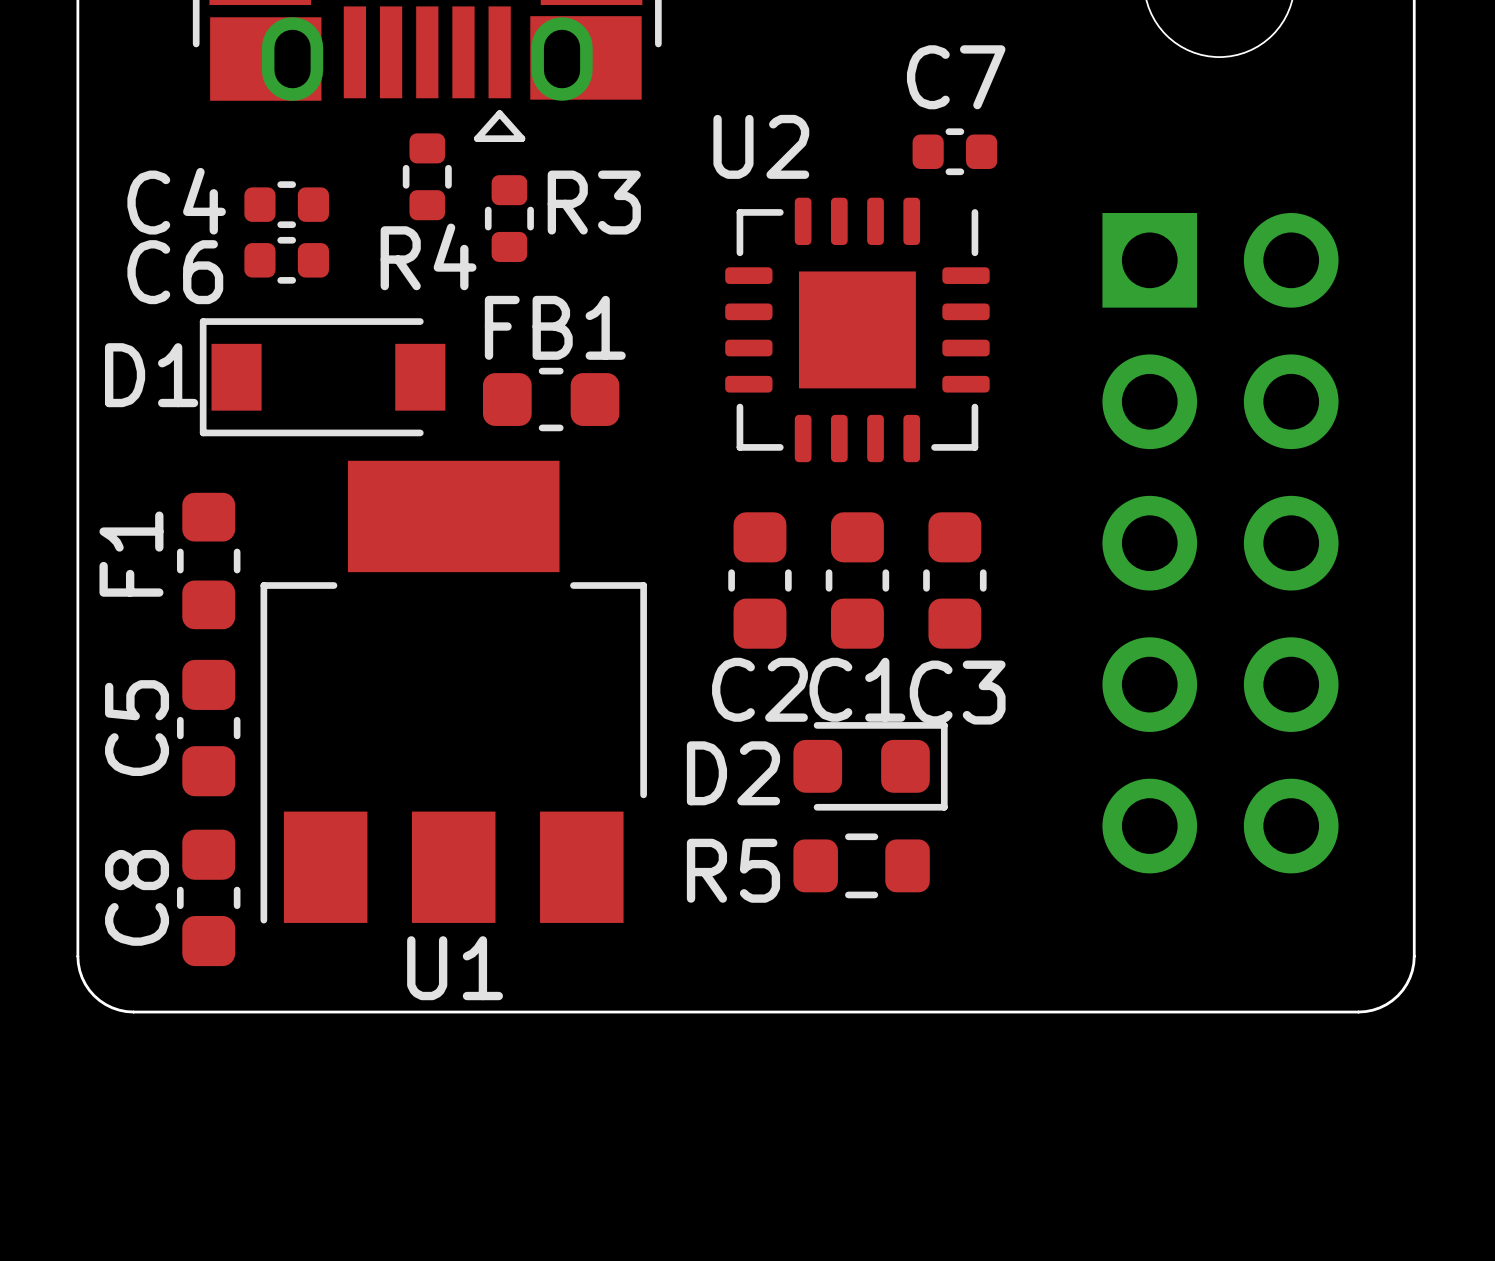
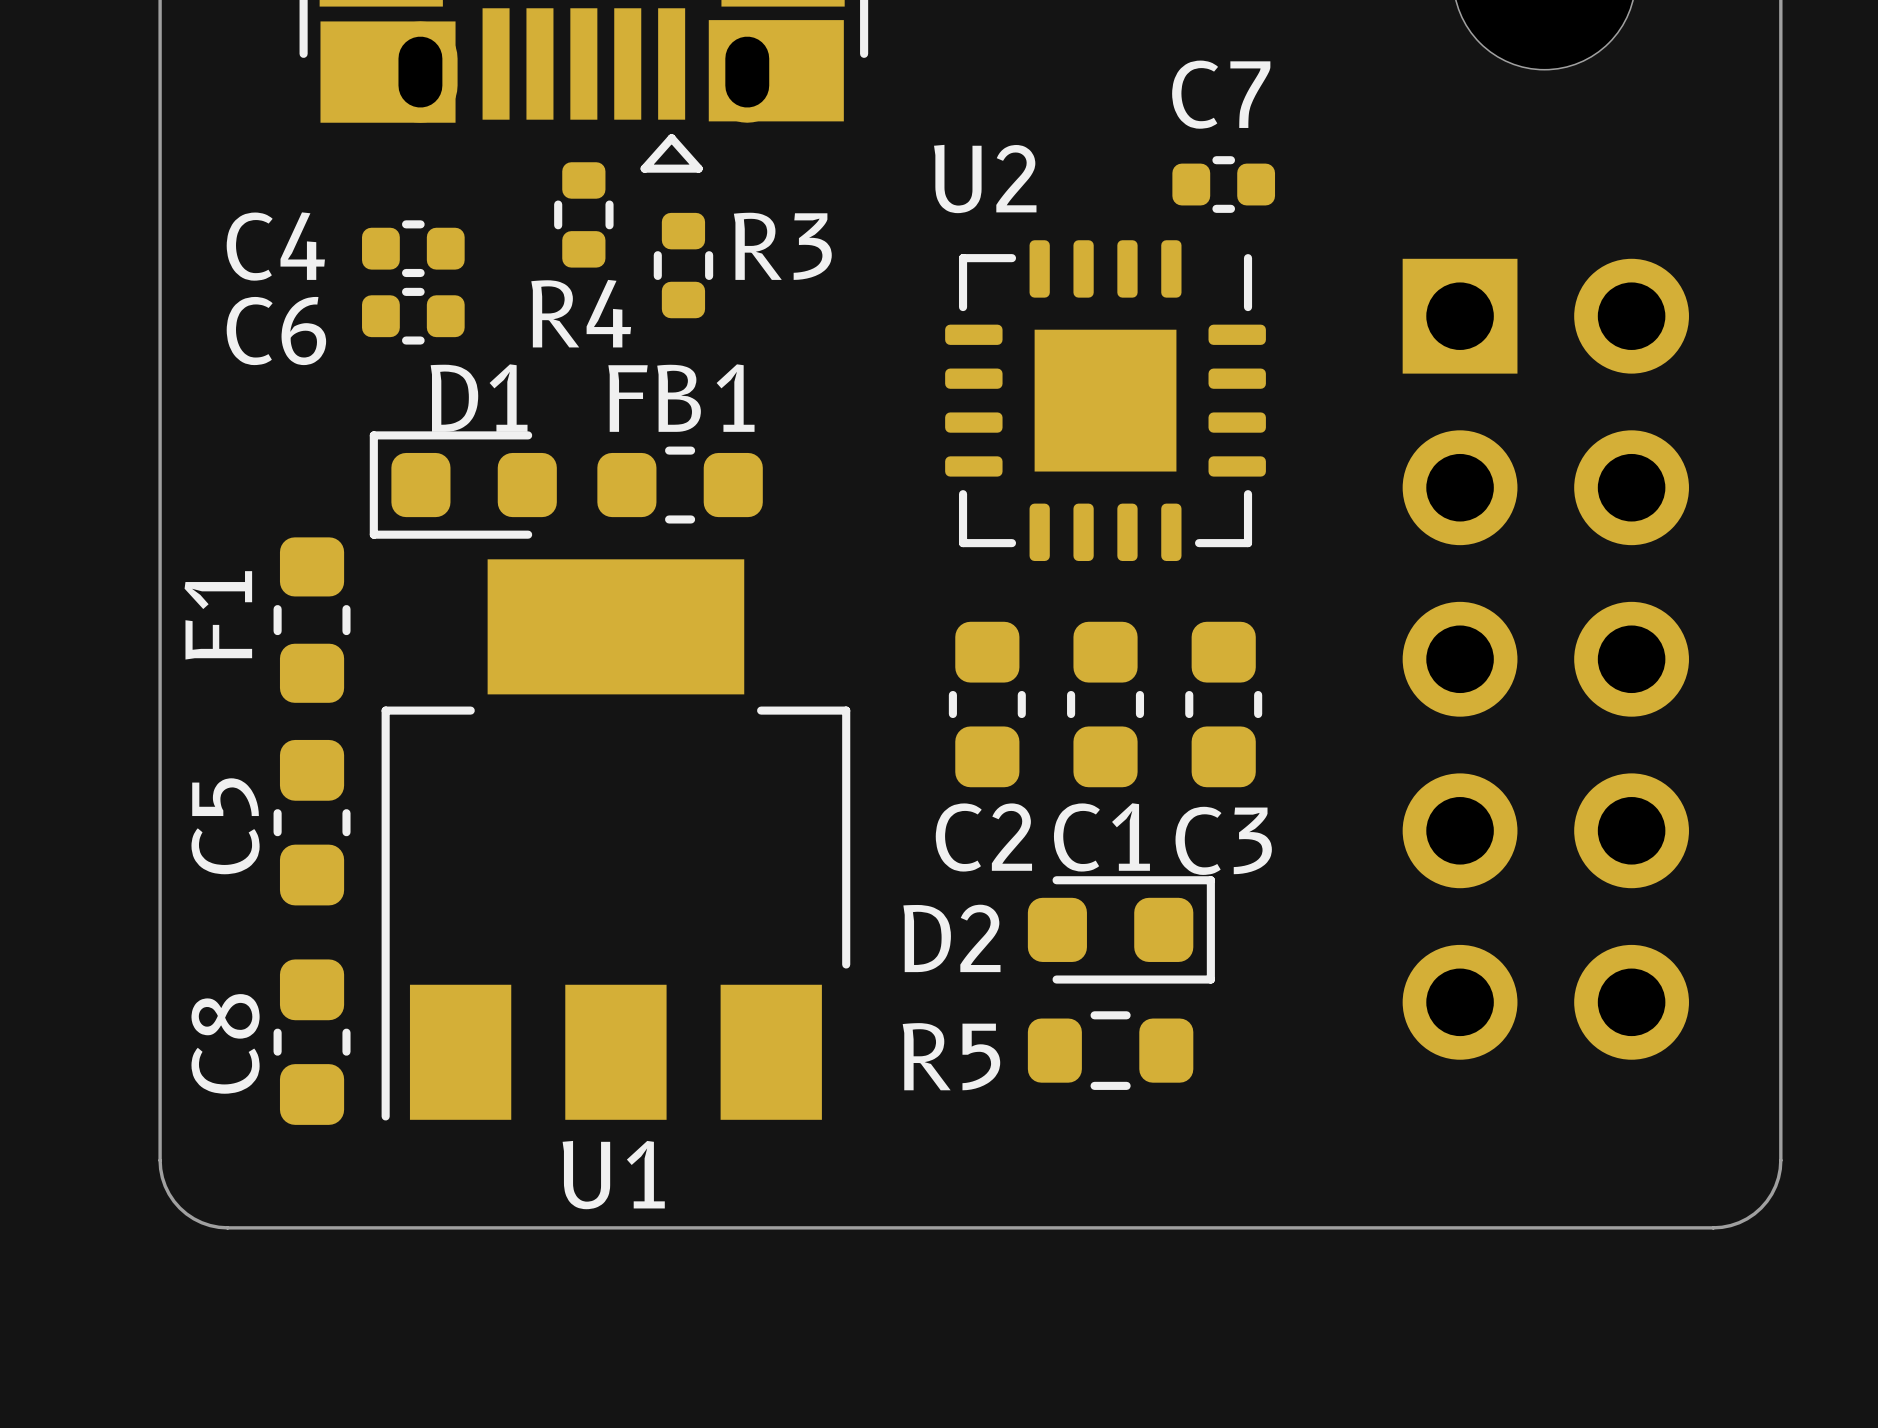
D1 footprint: [199, 318, 446, 437] -> [369, 431, 557, 539]
D1 name position: D1 (151, 375) -> D1 (479, 398)
FB1 position: (551, 399) -> (680, 485)
F1 position: (208, 561) -> (312, 620)
C5 position: (208, 728) -> (312, 822)
C8 position: (208, 897) -> (312, 1042)

